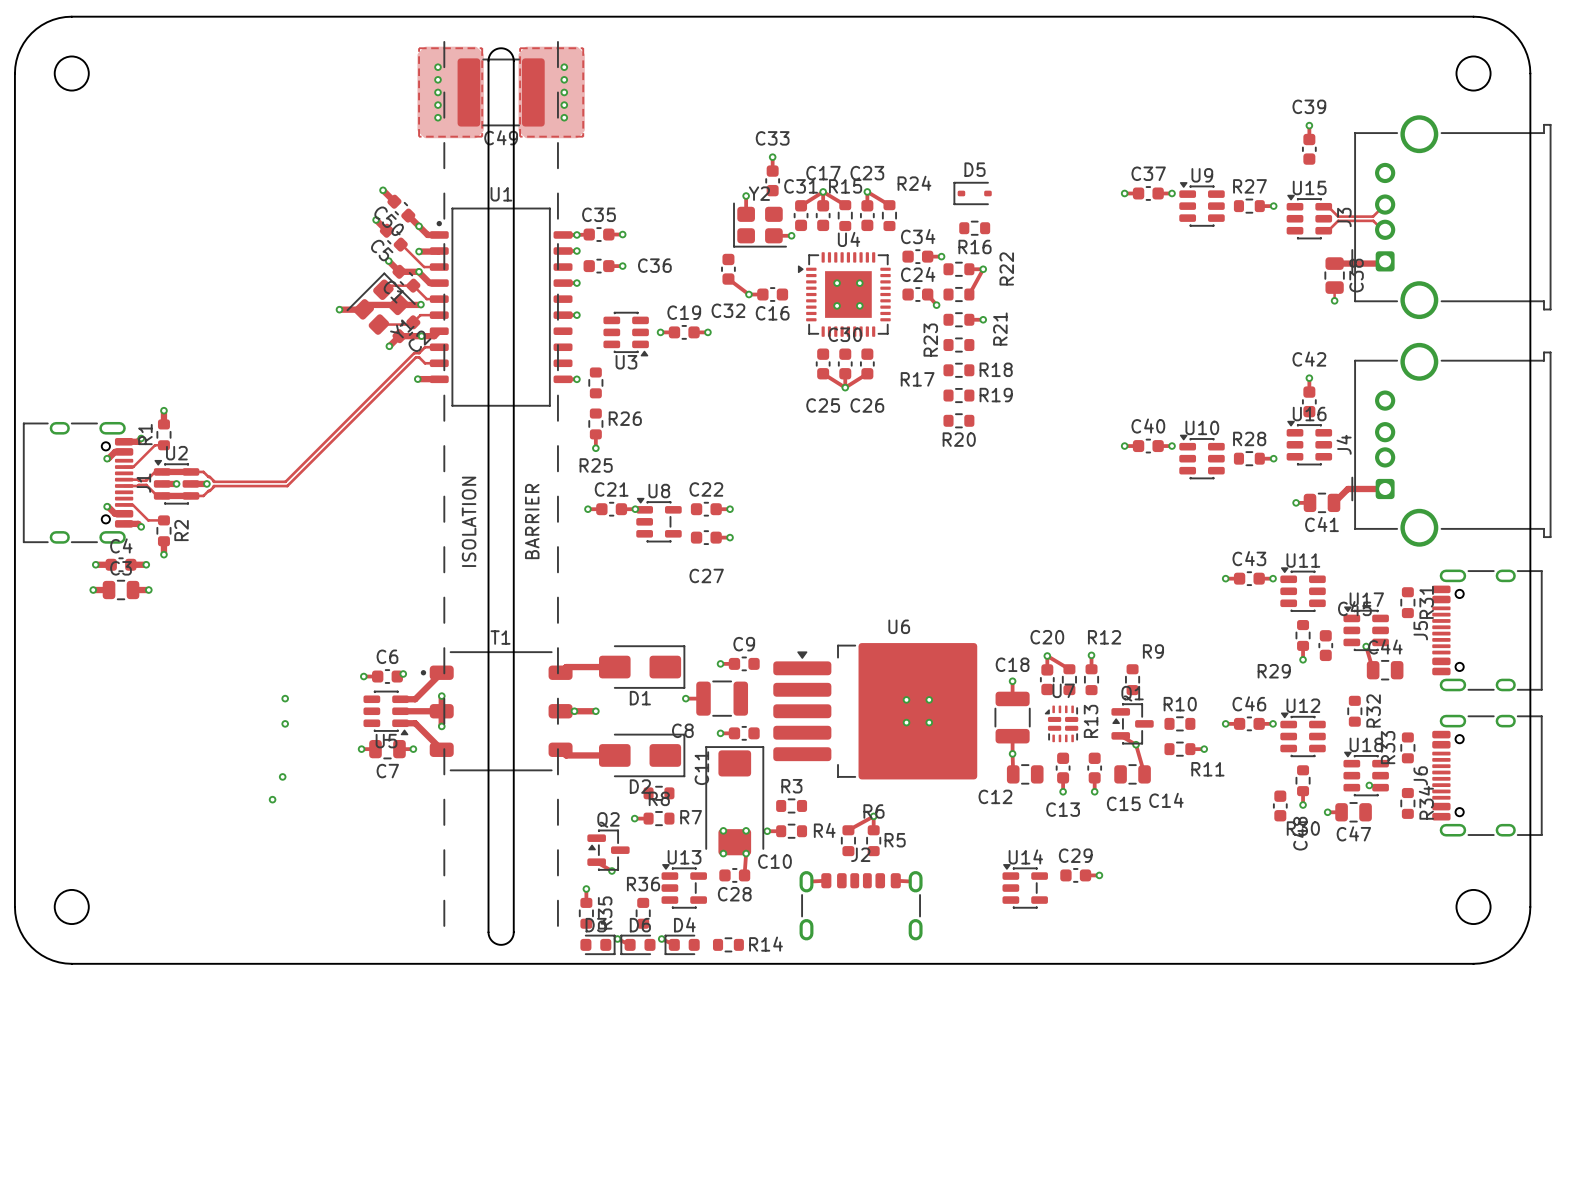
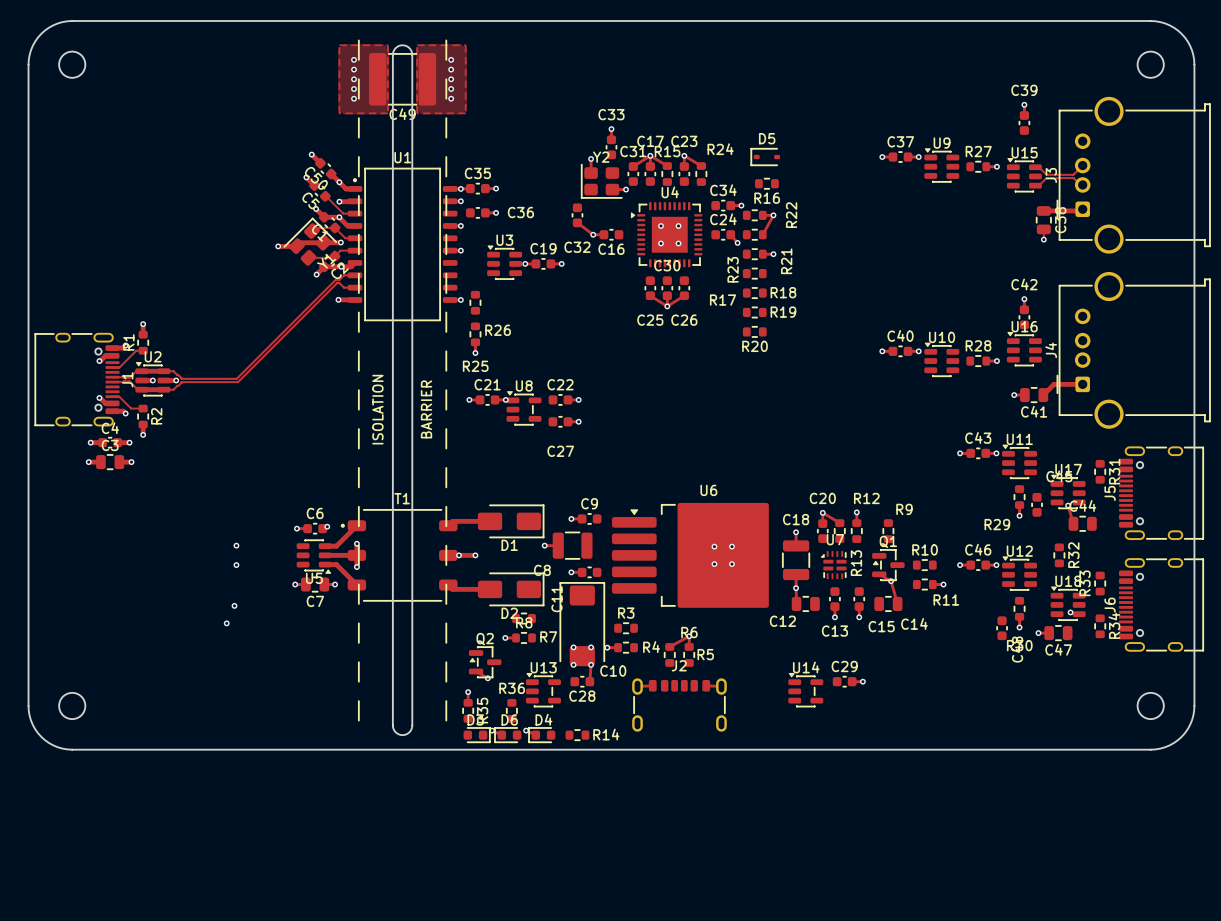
U3 rotation: 0° (626, 334) -> 180° (504, 262)

